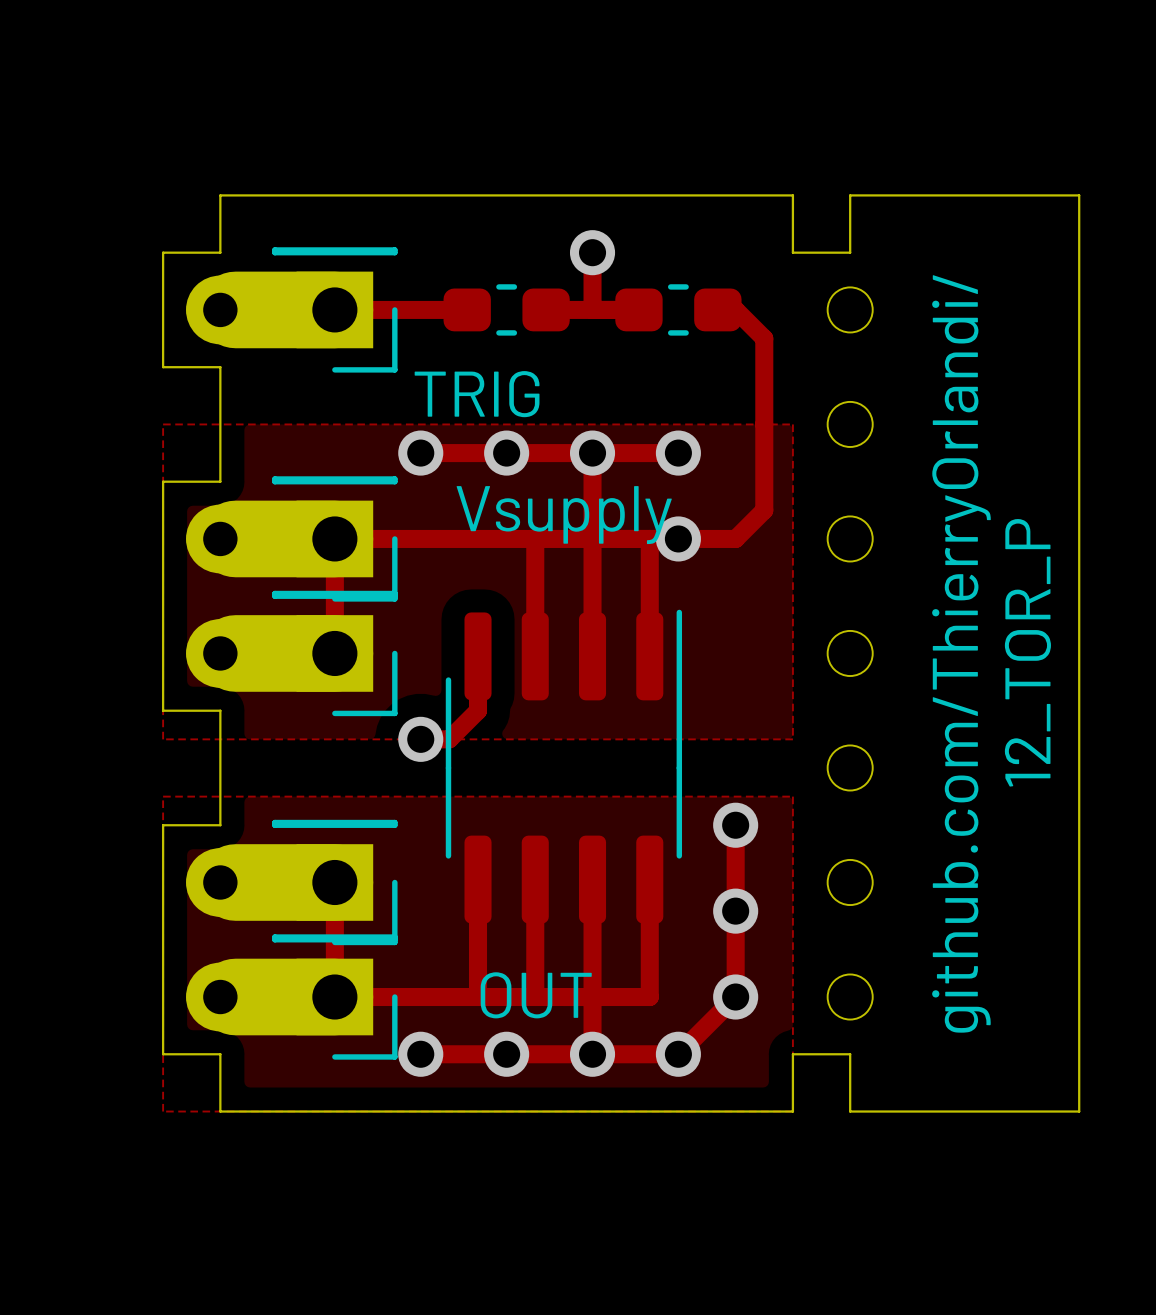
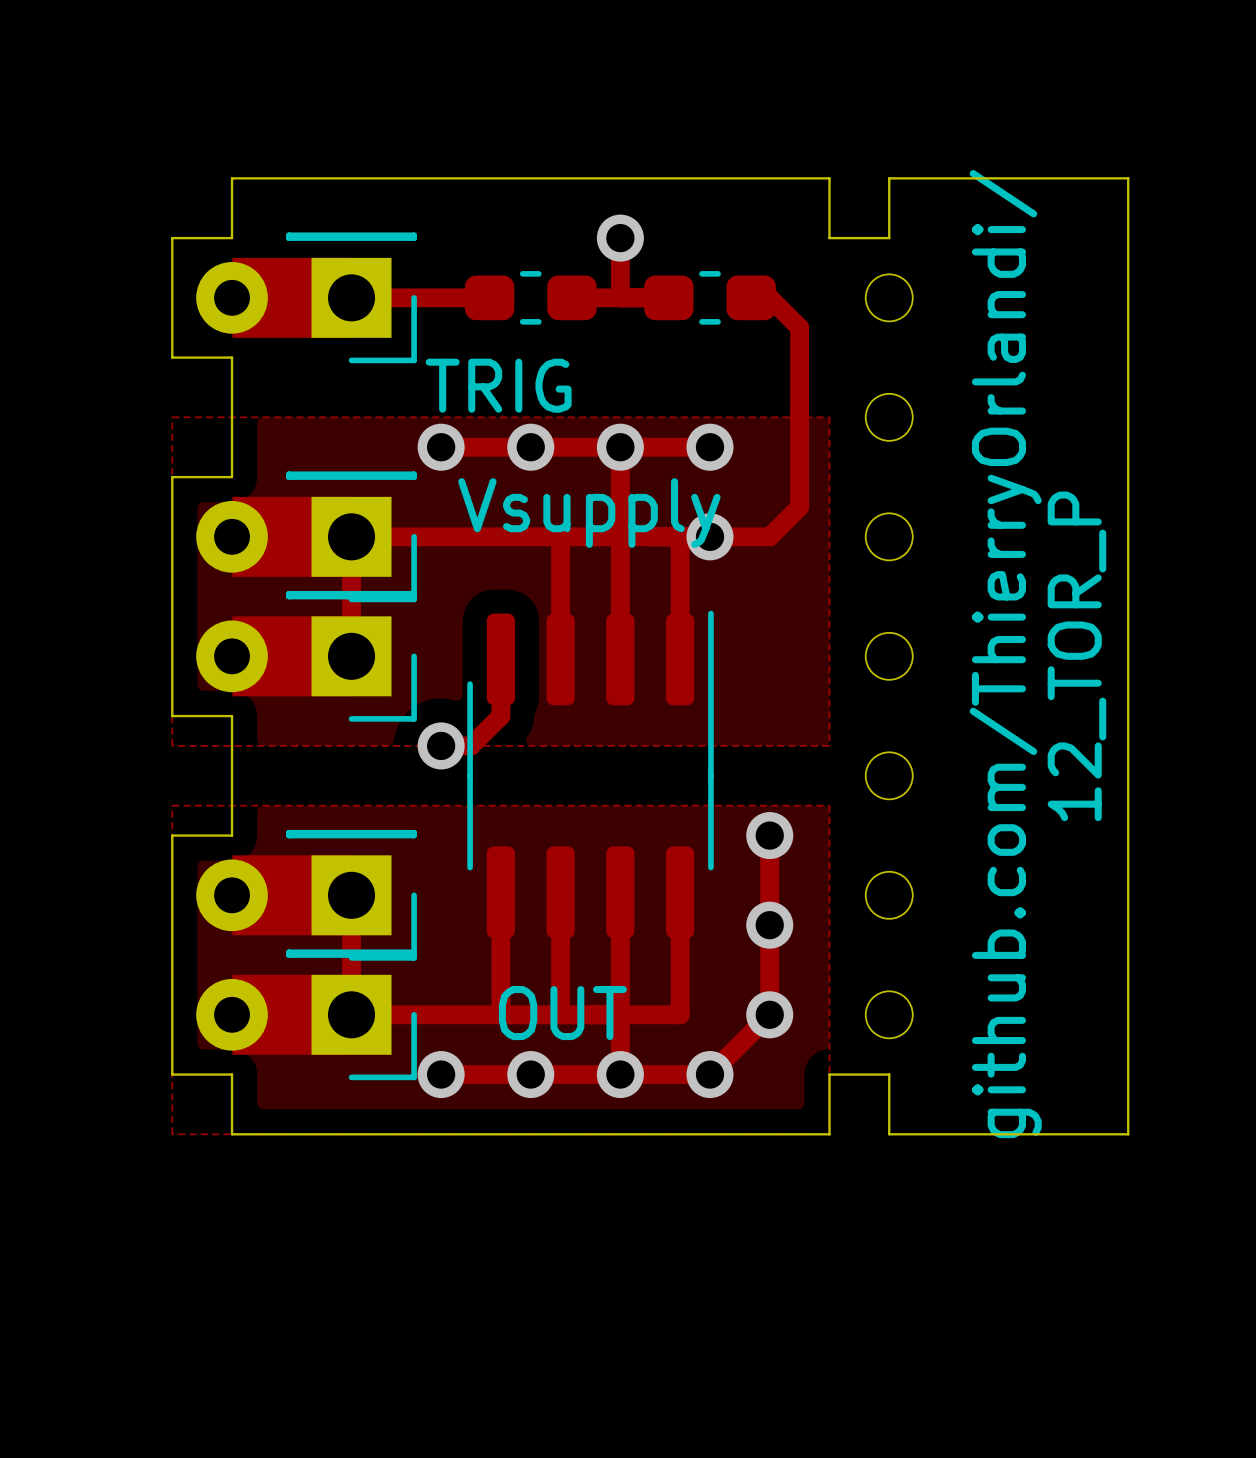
part footprint: [186, 247, 398, 373] -> [196, 232, 417, 364]
part footprint: [186, 476, 398, 602] -> [196, 471, 417, 603]
part footprint: [186, 590, 398, 717] -> [196, 590, 417, 722]
part footprint: [186, 819, 398, 946] -> [196, 829, 417, 961]
part footprint: [186, 934, 398, 1060] -> [196, 949, 417, 1081]

